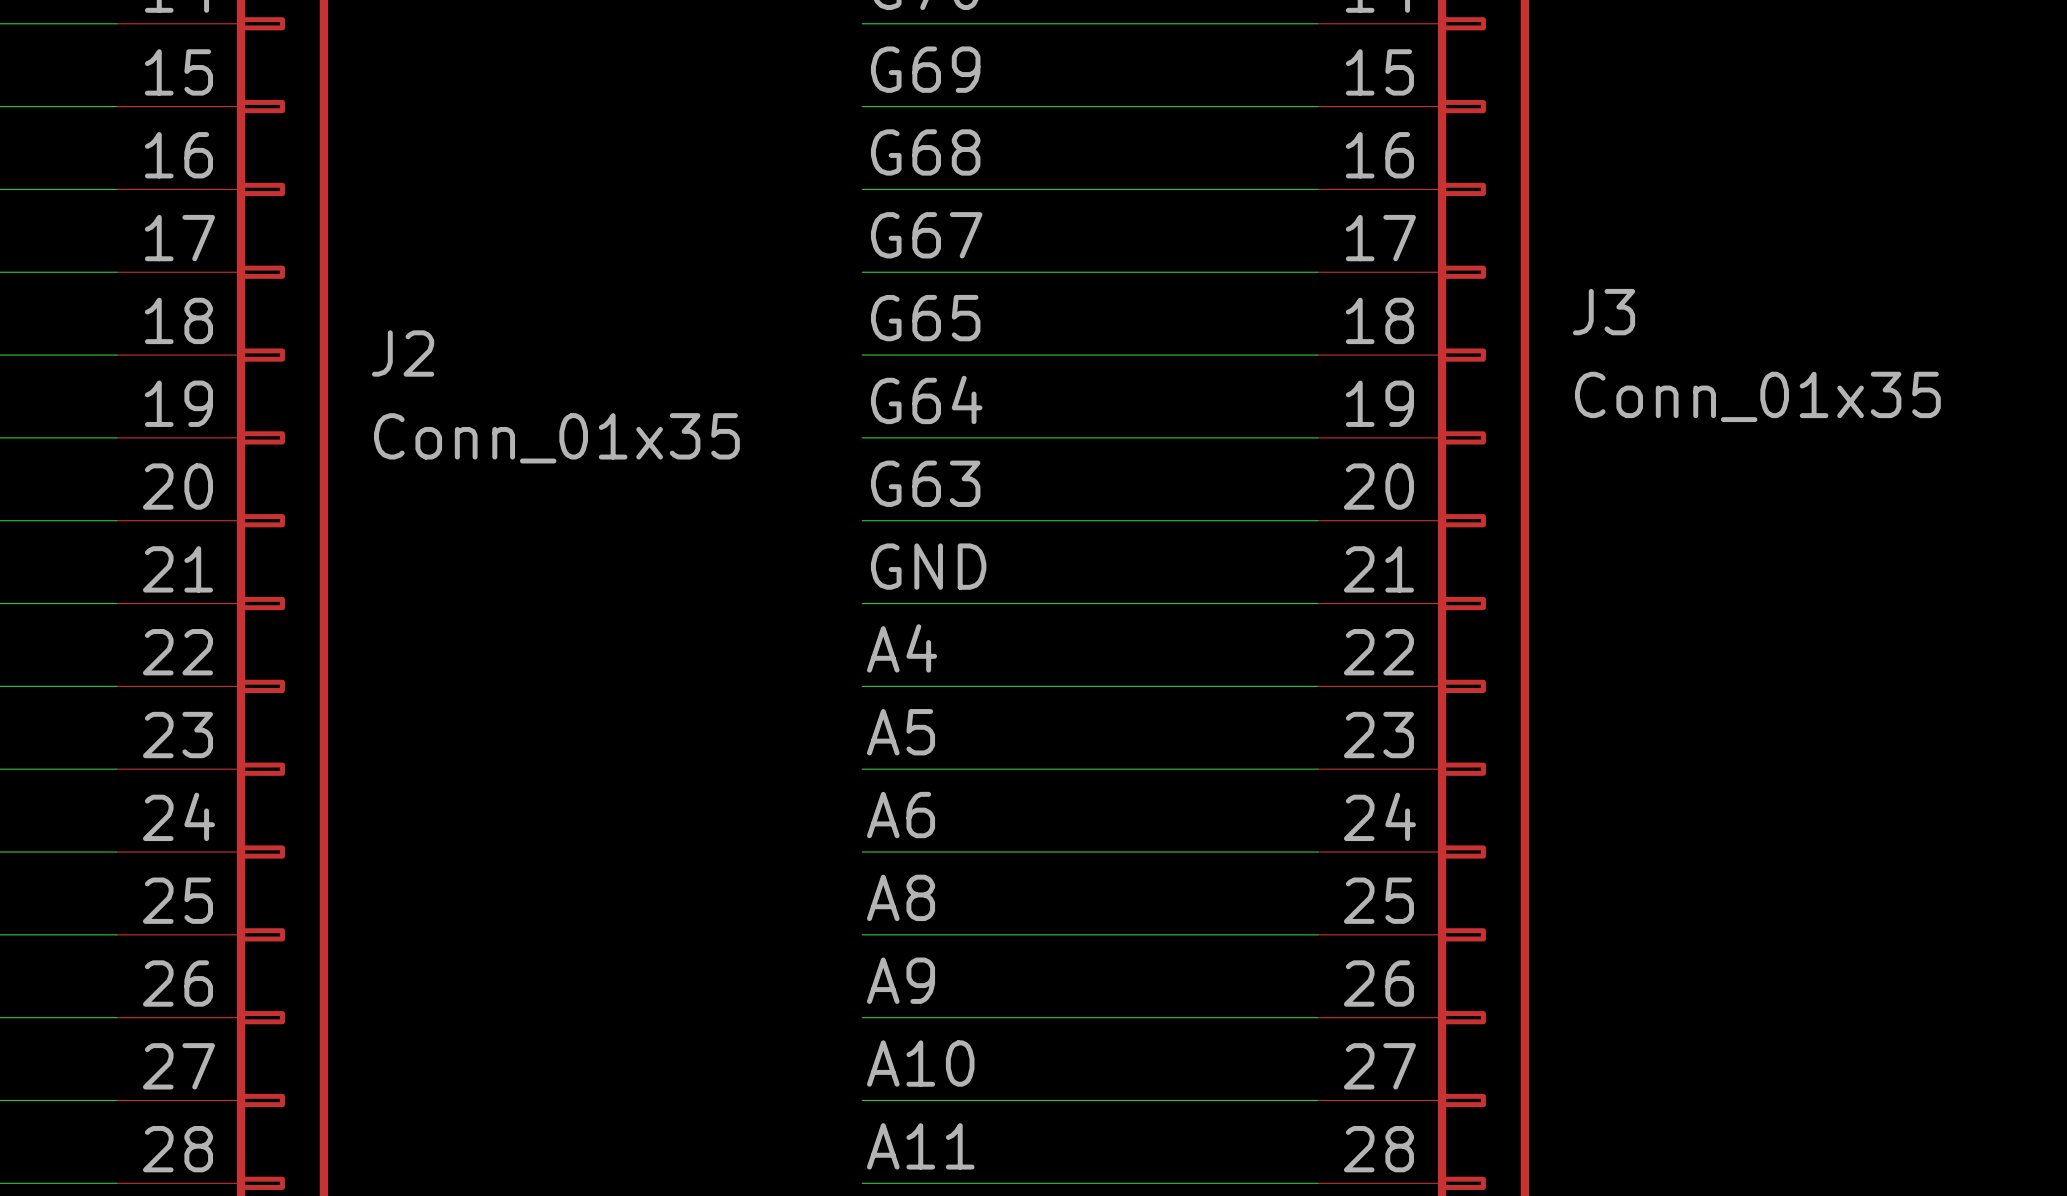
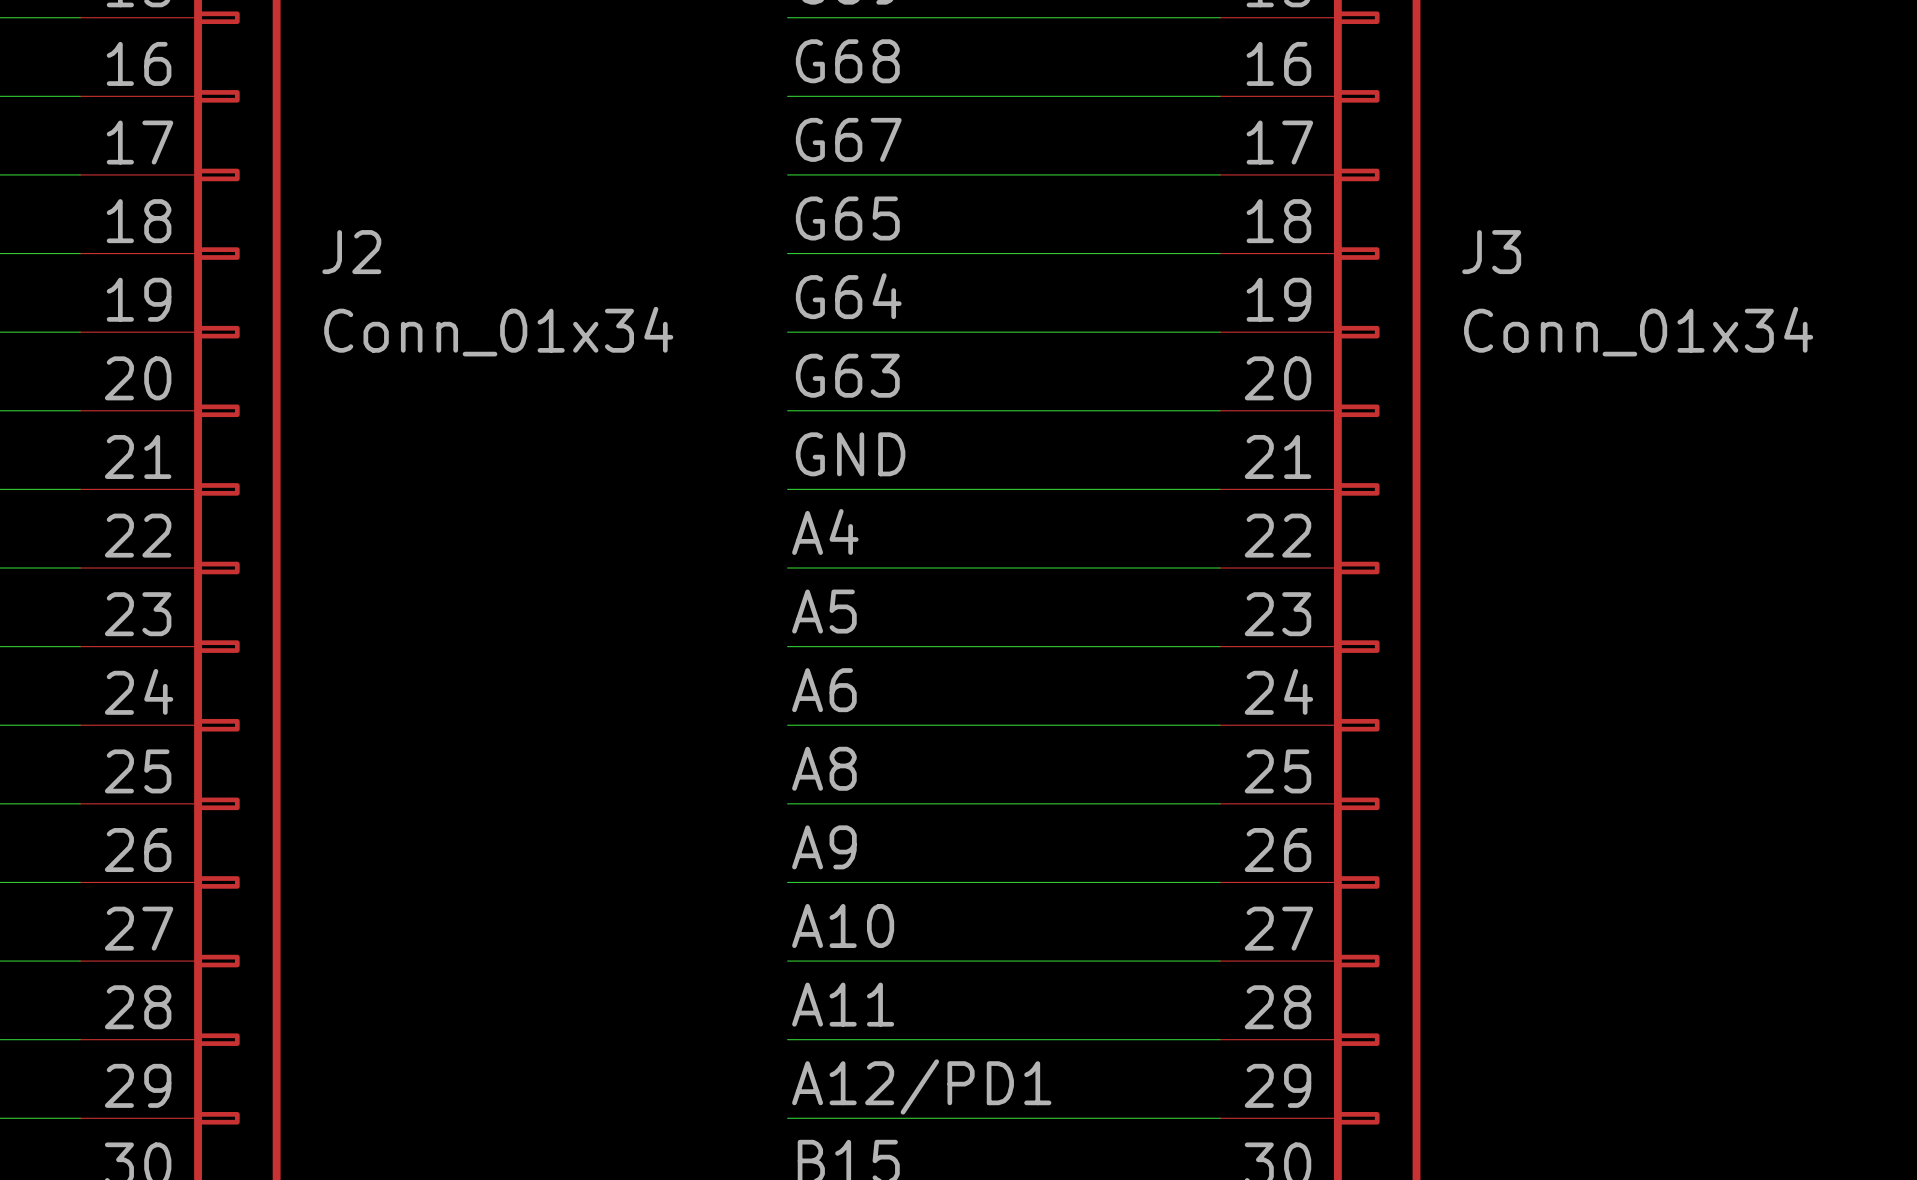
J3 name position: J3 (1604, 312) -> J3 (1491, 252)
J3 value: Conn_01x35 (1757, 396) -> Conn_01x34 (1638, 331)
J2 value: Conn_01x35 (556, 438) -> Conn_01x34 (498, 331)

